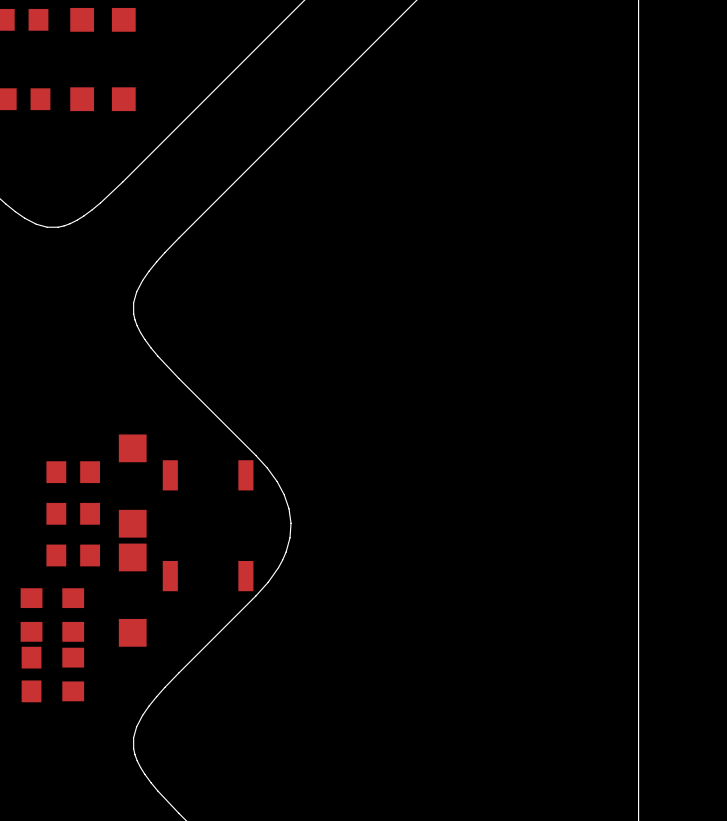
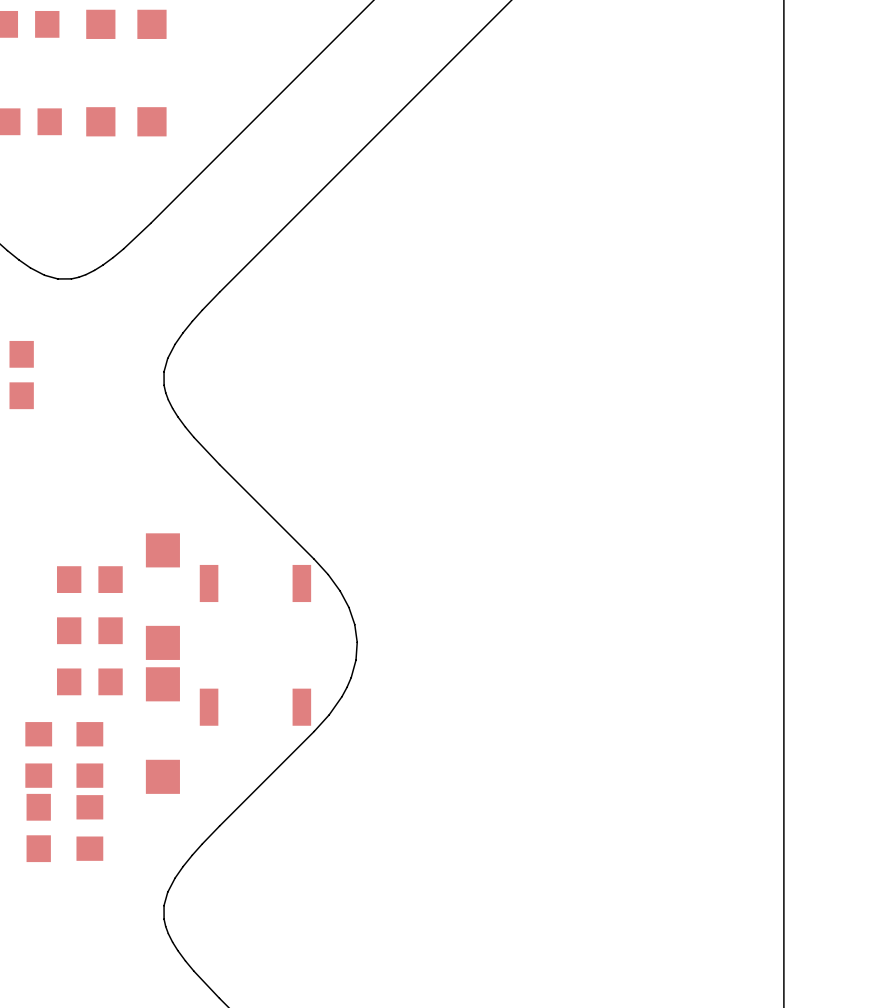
part: none -> (21, 375)

